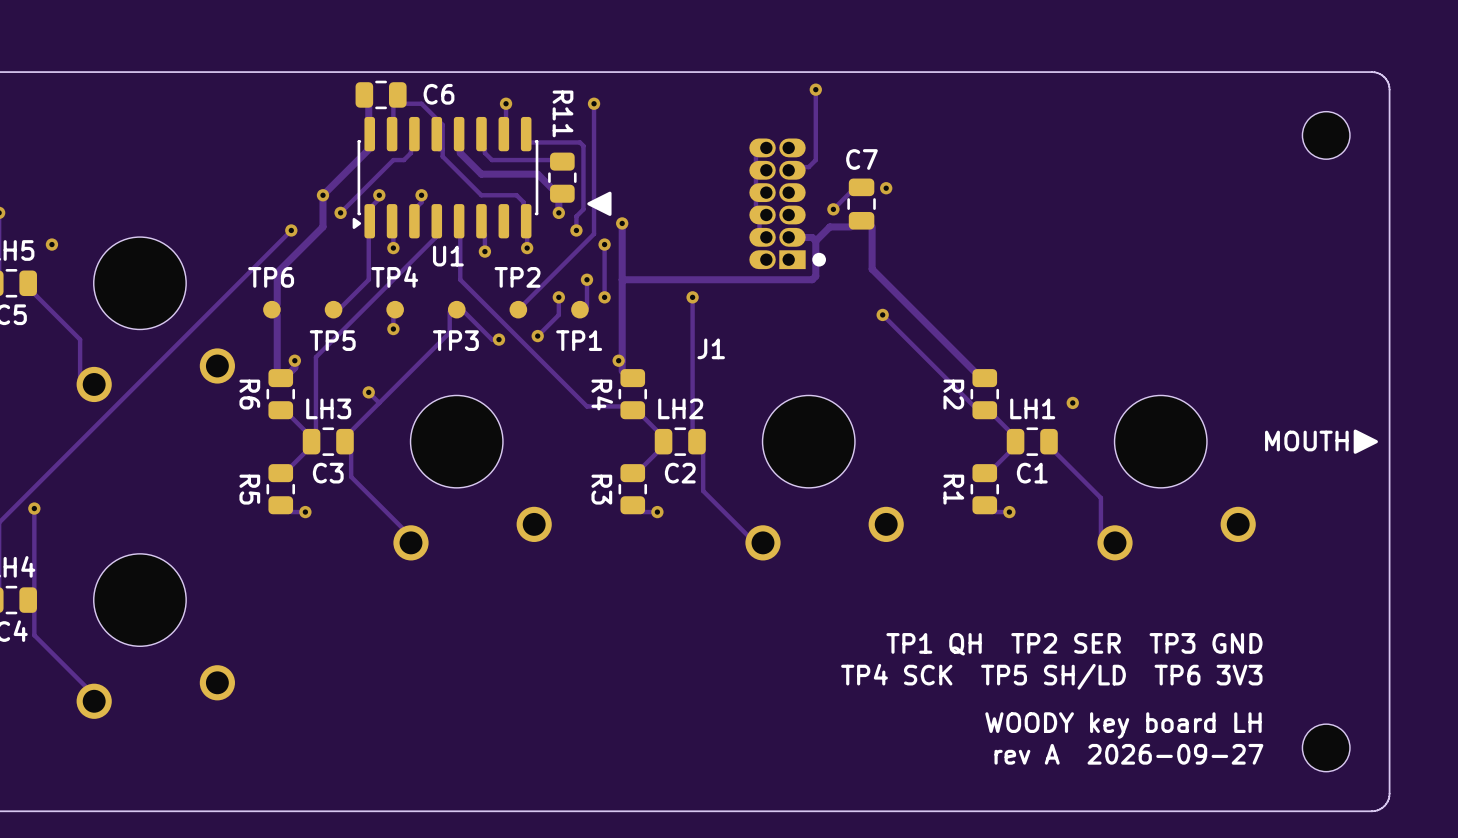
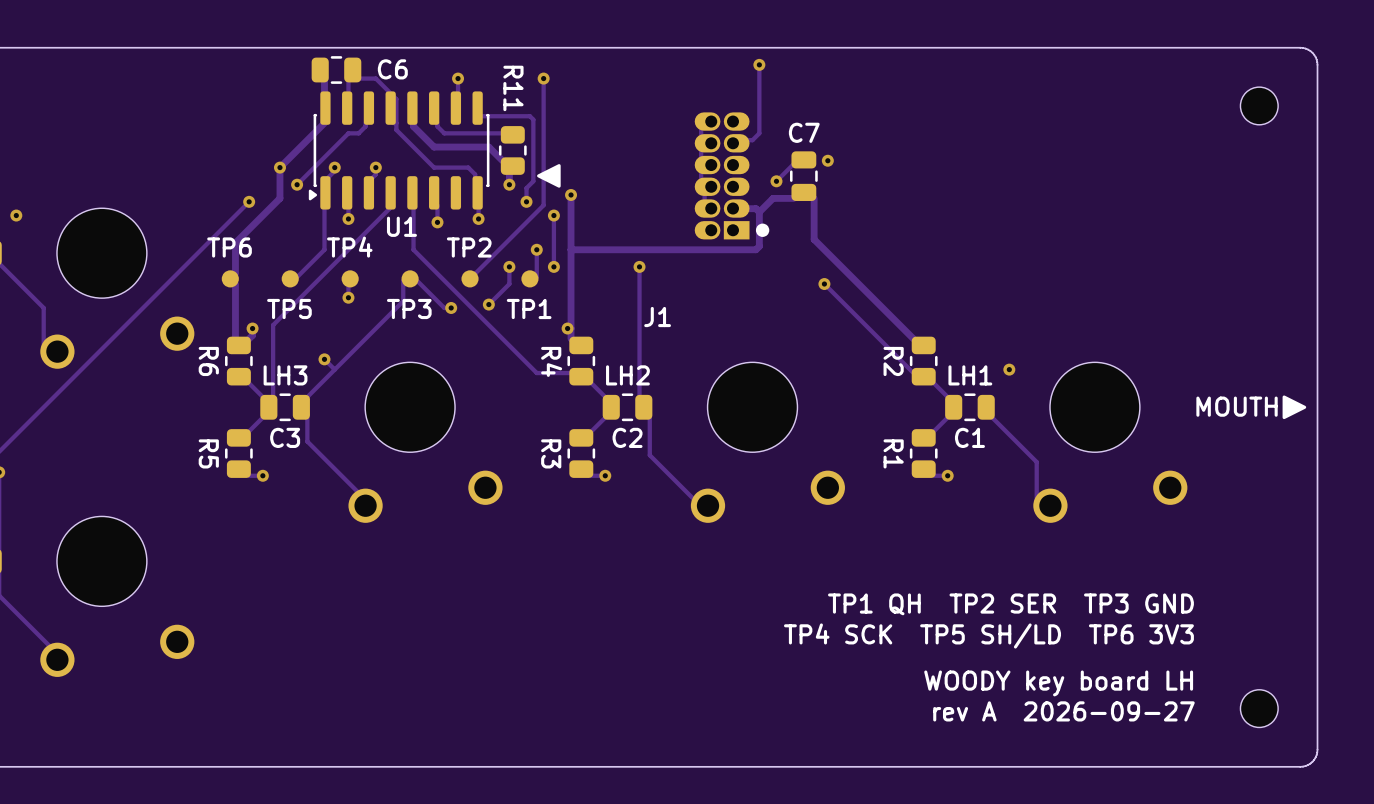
part footprint: [1302, 111, 1350, 160] -> [1240, 87, 1279, 125]
part footprint: [1302, 724, 1350, 772] -> [1240, 689, 1279, 728]

